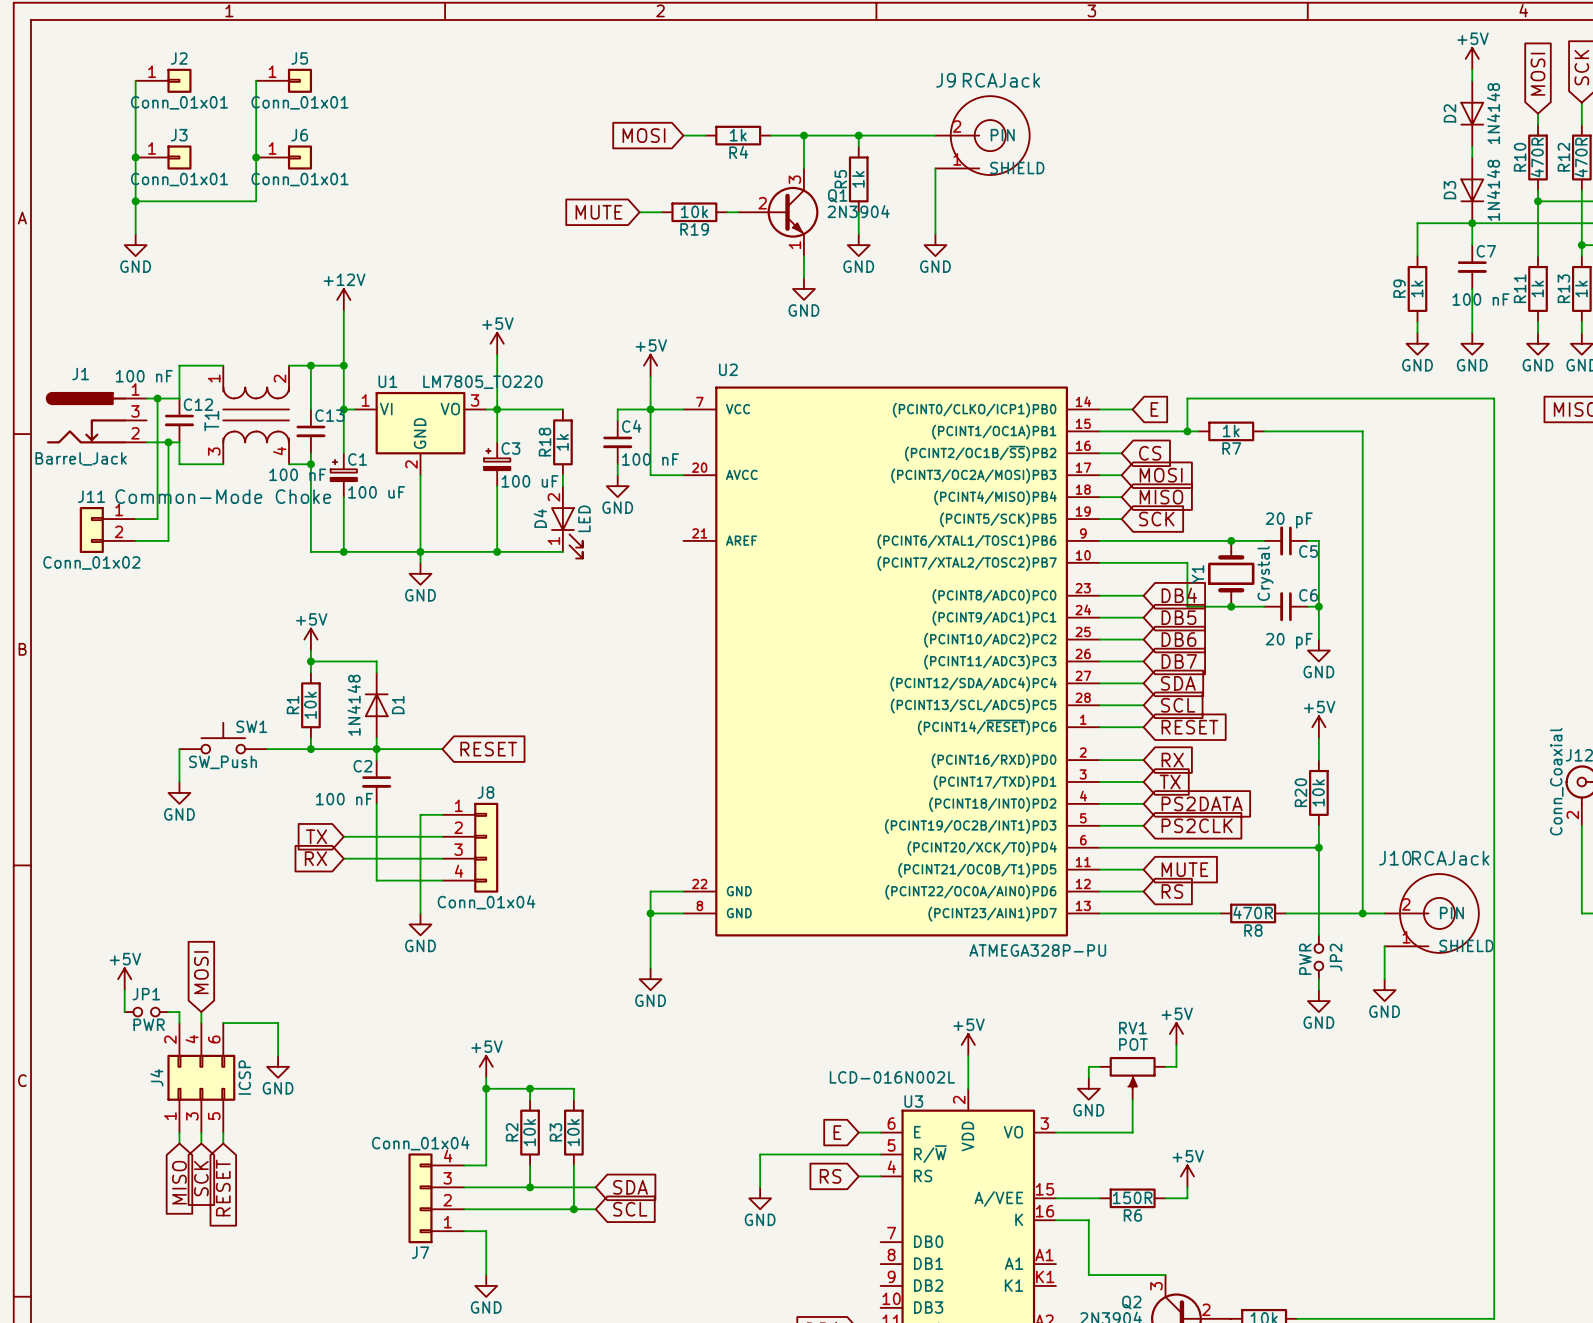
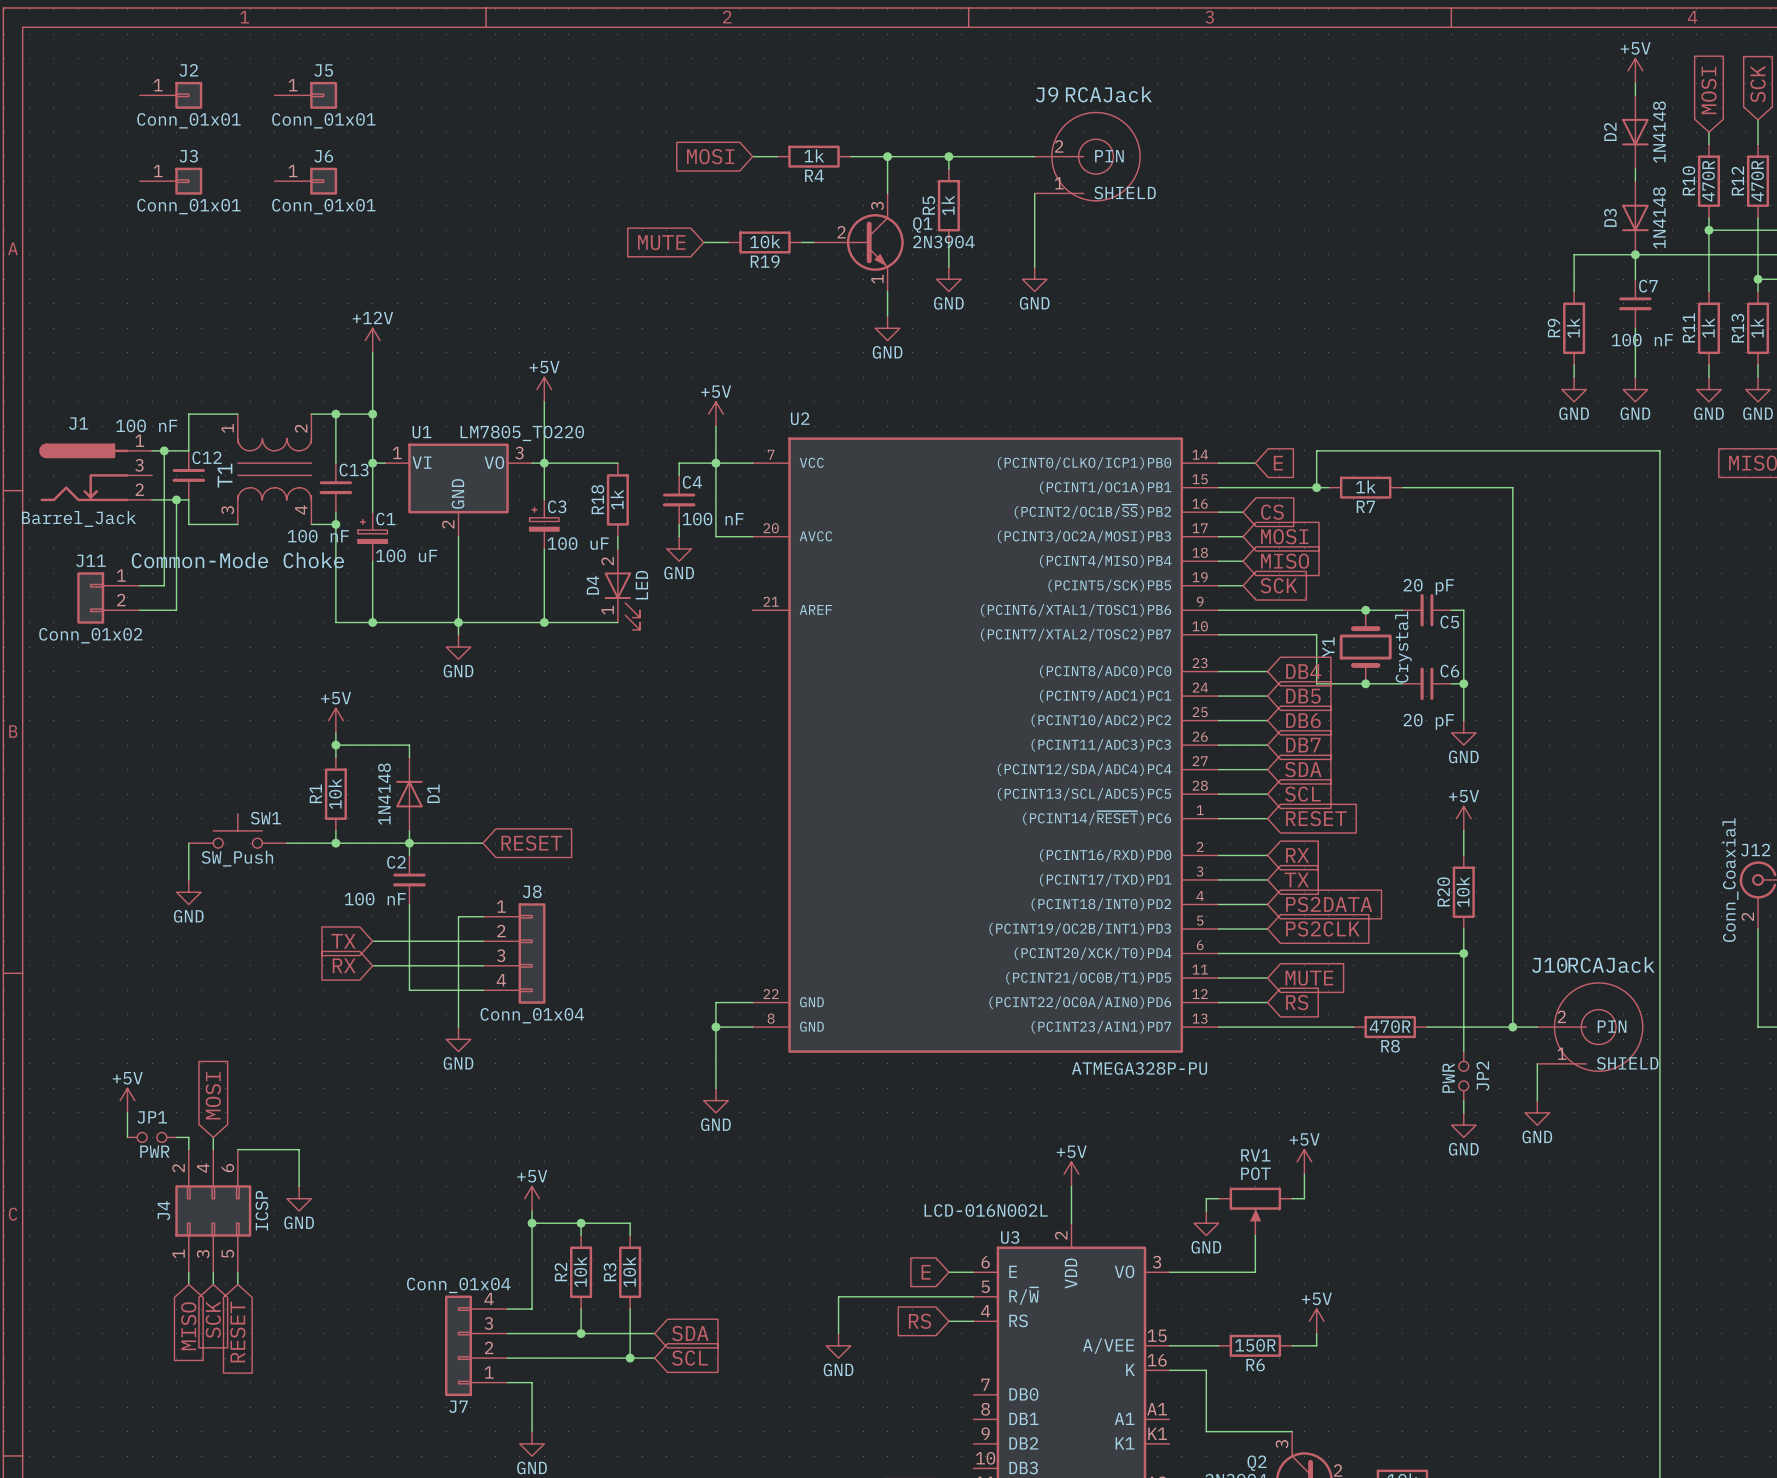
wire: (135, 80) (135, 234) -> none
wire: (256, 80) (256, 201) (135, 201) -> none
junction: (135, 157) -> none
junction: (256, 157) -> none
junction: (135, 201) -> none
power symbol: GND (135, 245) -> none

